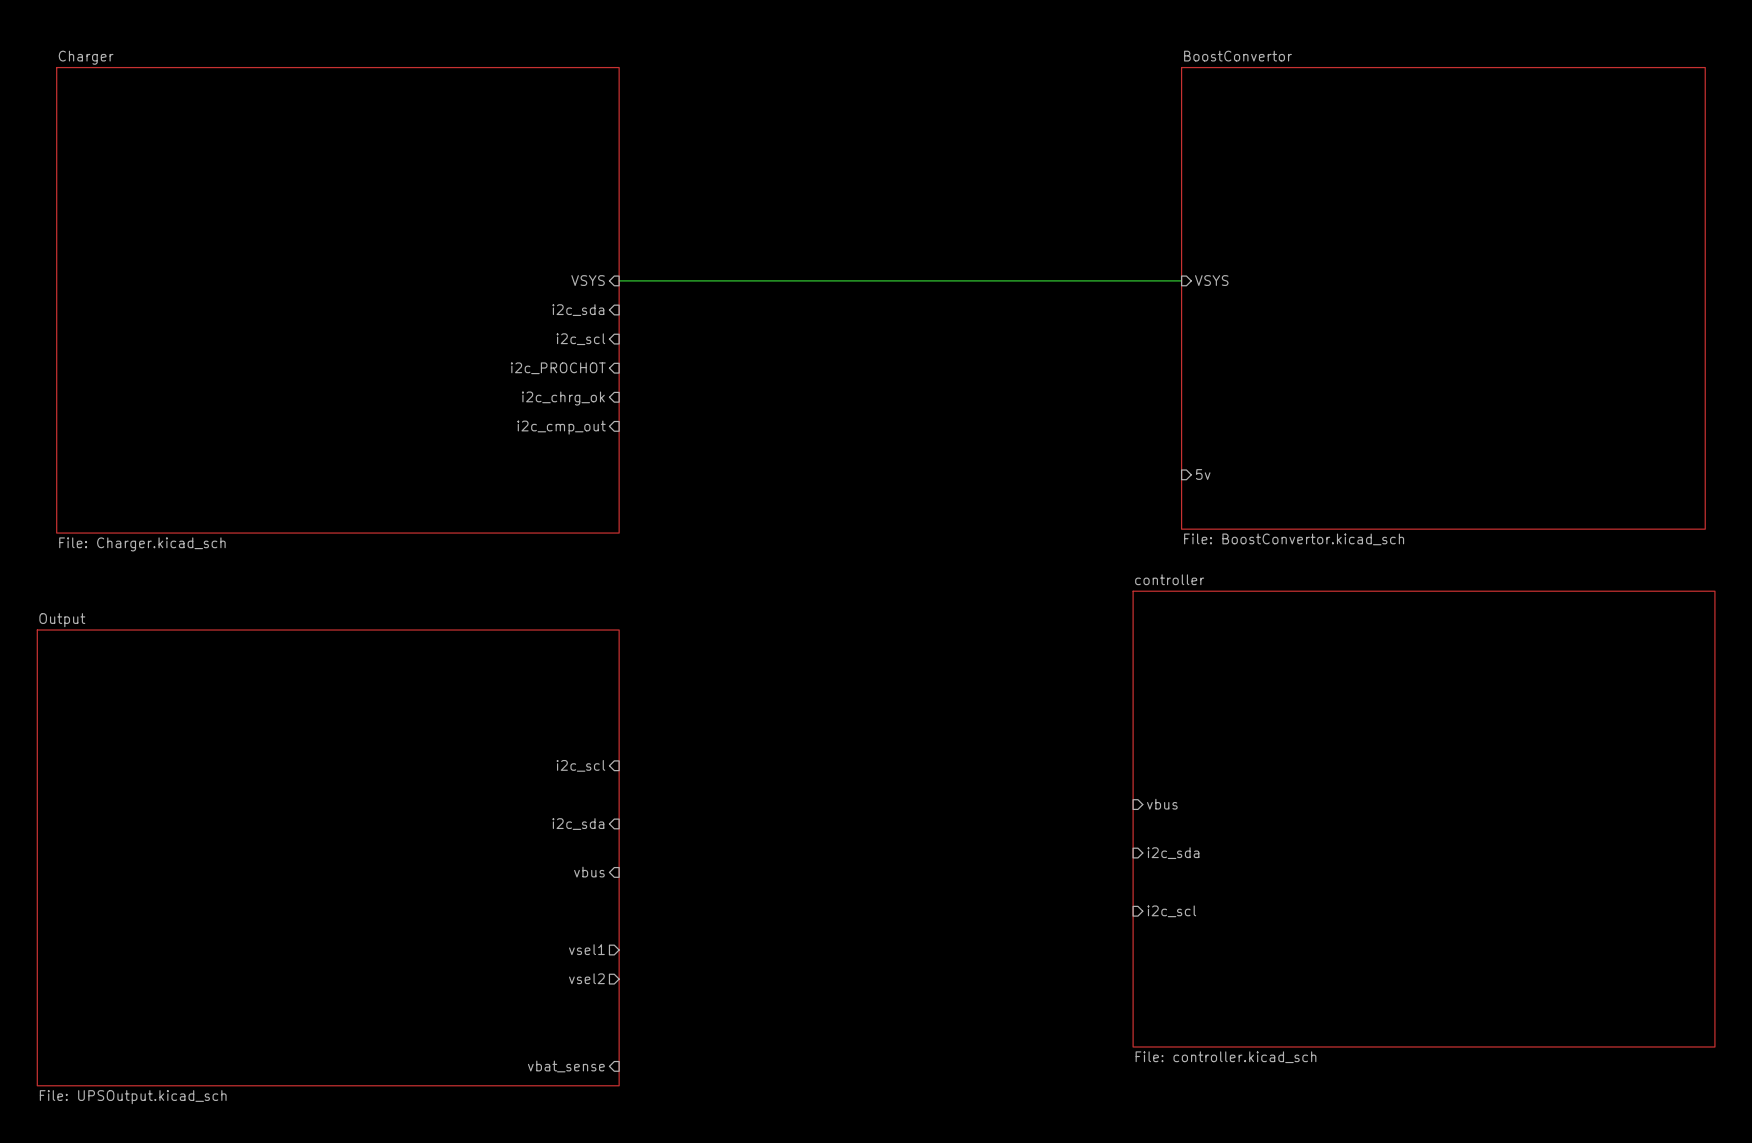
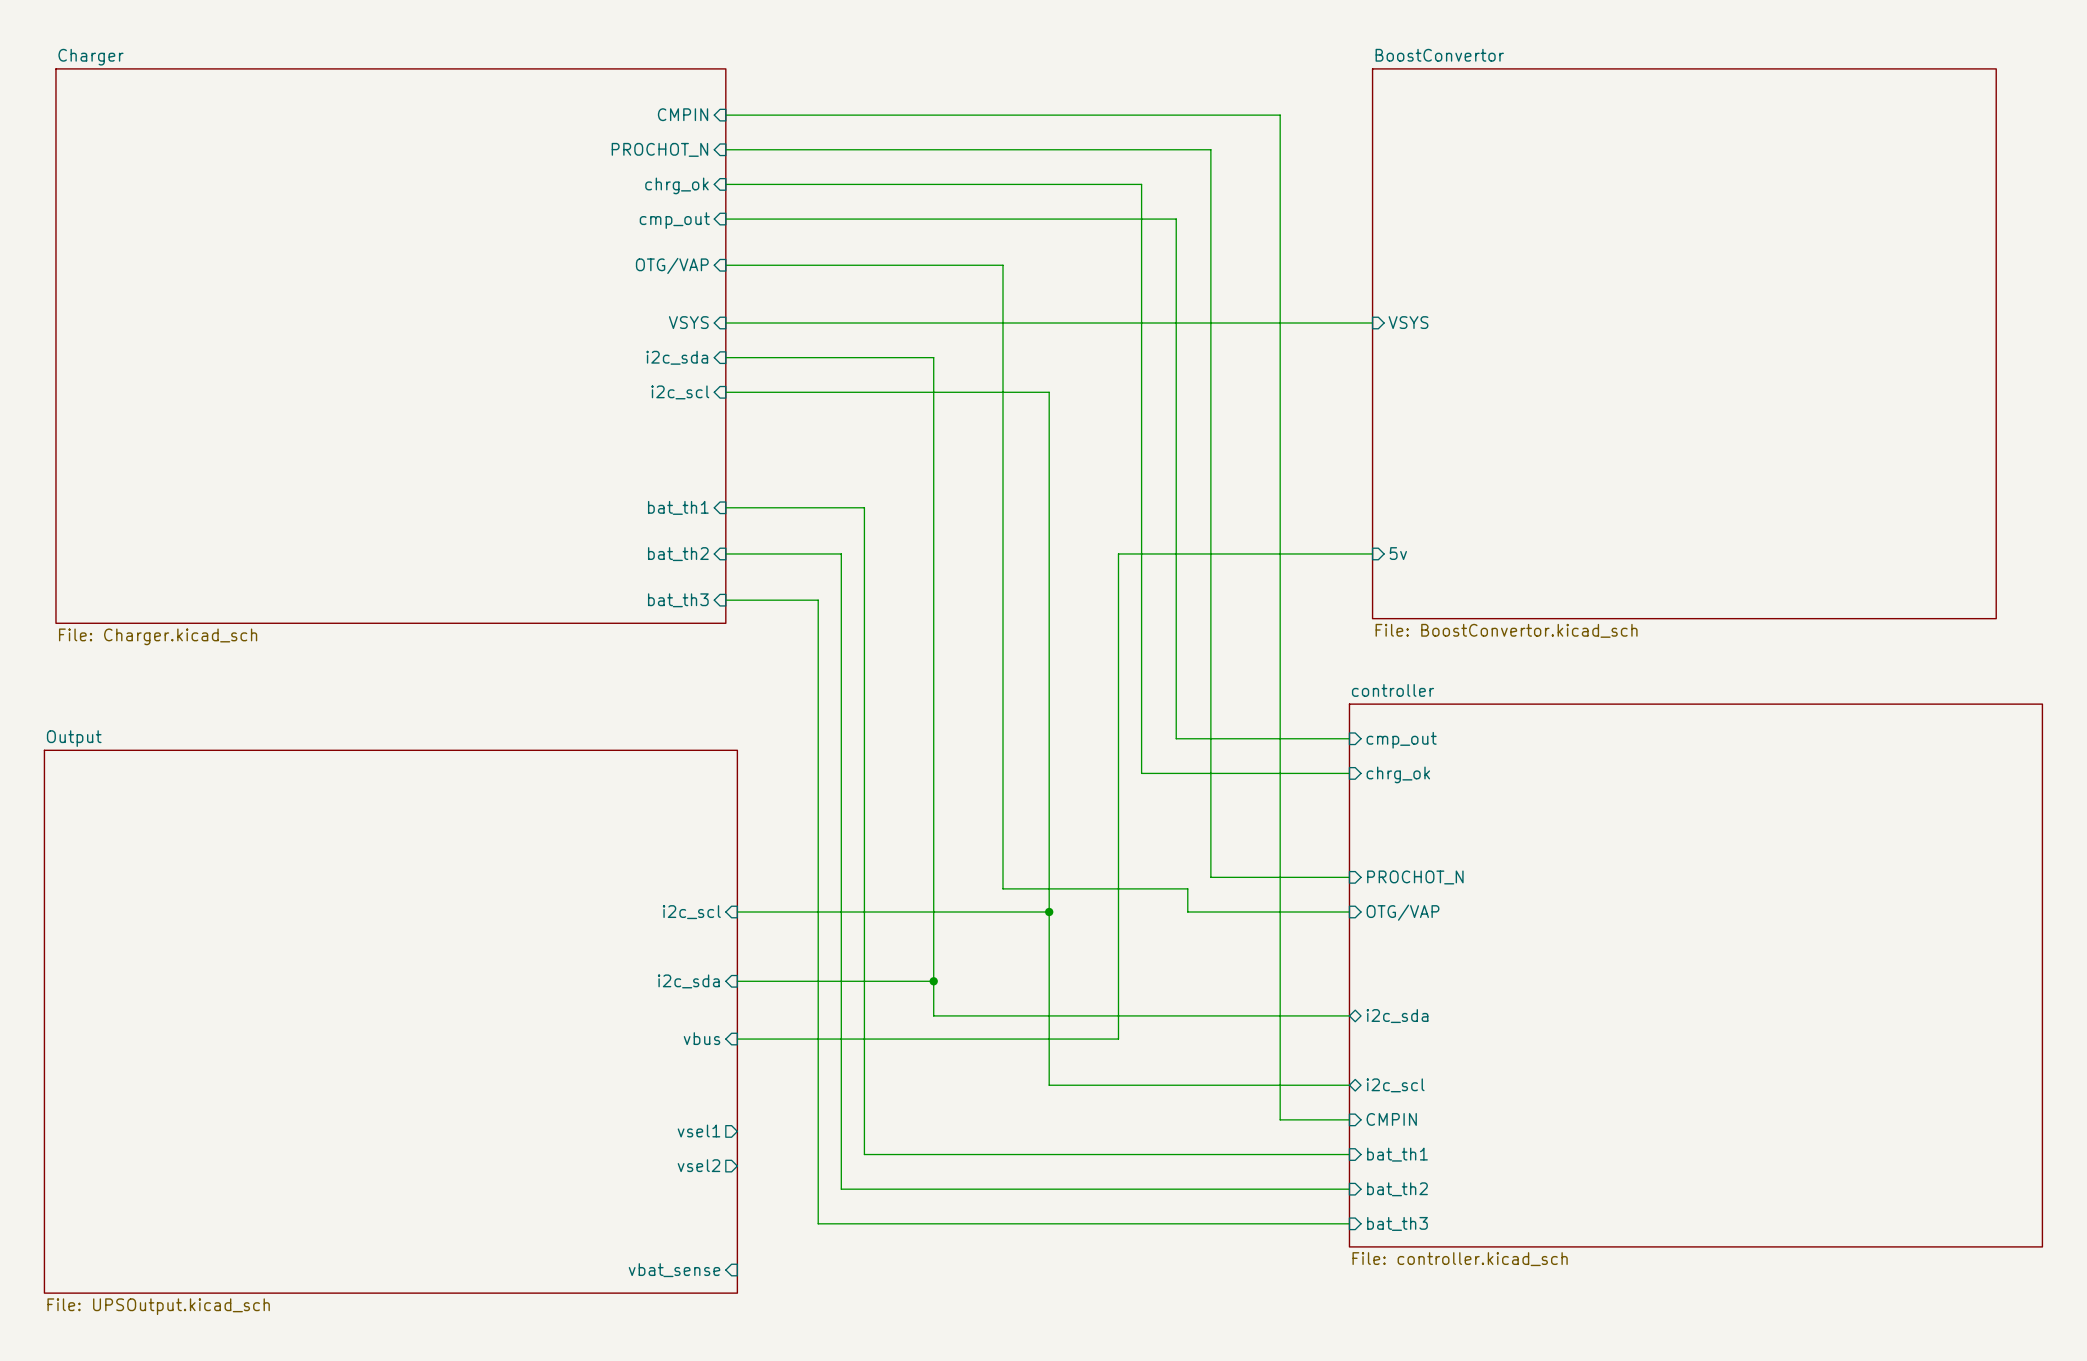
sheet pin: none -> CMPIN (683, 114)
wire: none -> (725, 115) (1280, 115) (1280, 1119) (1349, 1119)
sheet pin: none -> PROCHOT_N (659, 149)
wire: none -> (725, 149) (1210, 149) (1210, 877) (1349, 877)
wire: none -> (725, 184) (1141, 184) (1141, 773) (1349, 773)
sheet pin: none -> chrg_ok (676, 185)
wire: none -> (725, 219) (1176, 219) (1176, 738) (1349, 738)
sheet pin: none -> cmp_out (674, 220)
wire: none -> (725, 265) (1003, 265) (1003, 888) (1187, 888) (1187, 912) (1349, 912)
sheet pin: none -> OTG/VAP (672, 265)
wire: none -> (725, 323) (1372, 323)
sheet pin position: VSYS (588, 280) -> VSYS (688, 322)
wire: (619, 280) (1181, 280) -> none
sheet pin position: VSYS (1211, 280) -> VSYS (1408, 322)
sheet BoostConvertor position: (1443, 298) -> (1684, 343)
sheet Charger position: (337, 300) -> (390, 346)
wire: none -> (725, 357) (933, 357) (933, 1015) (1349, 1015)
sheet pin position: i2c_sda (578, 310) -> i2c_sda (677, 357)
wire: none -> (725, 392) (1049, 392) (1049, 1085) (1349, 1085)
sheet pin position: i2c_scl (580, 339) -> i2c_scl (680, 392)
sheet pin: i2c_PROCHOT (558, 368) -> none
sheet pin: i2c_chrg_ok (563, 398) -> none
sheet pin: none -> bat_th1 (678, 507)
wire: none -> (725, 507) (864, 507) (864, 1154) (1349, 1154)
sheet pin: i2c_cmp_out (561, 427) -> none
sheet pin: none -> bat_th2 (678, 554)
wire: none -> (725, 553) (841, 553) (841, 1189) (1349, 1189)
wire: none -> (1372, 553) (1118, 553) (1118, 1039) (737, 1039)
sheet pin position: 5v (1203, 474) -> 5v (1398, 553)
wire: none -> (725, 600) (818, 600) (818, 1223) (1349, 1223)
sheet pin: none -> bat_th3 (678, 600)
sheet pin: none -> cmp_out (1401, 740)
sheet pin: none -> chrg_ok (1398, 774)
sheet pin: none -> PROCHOT_N (1415, 877)
wire: none -> (737, 912) (1049, 912)
junction: none -> (1049, 912)
sheet pin: none -> OTG/VAP (1403, 912)
sheet pin: vbus (1162, 804) -> none
wire: none -> (737, 981) (933, 981)
junction: none -> (933, 981)
sheet pin shape: input (1173, 853) -> bidirectional (1397, 1016)
sheet pin shape: input (1171, 911) -> bidirectional (1395, 1085)
sheet pin: none -> CMPIN (1391, 1119)
sheet pin: none -> bat_th1 (1397, 1154)
sheet pin: none -> bat_th2 (1397, 1189)
sheet pin: none -> bat_th3 (1397, 1223)

